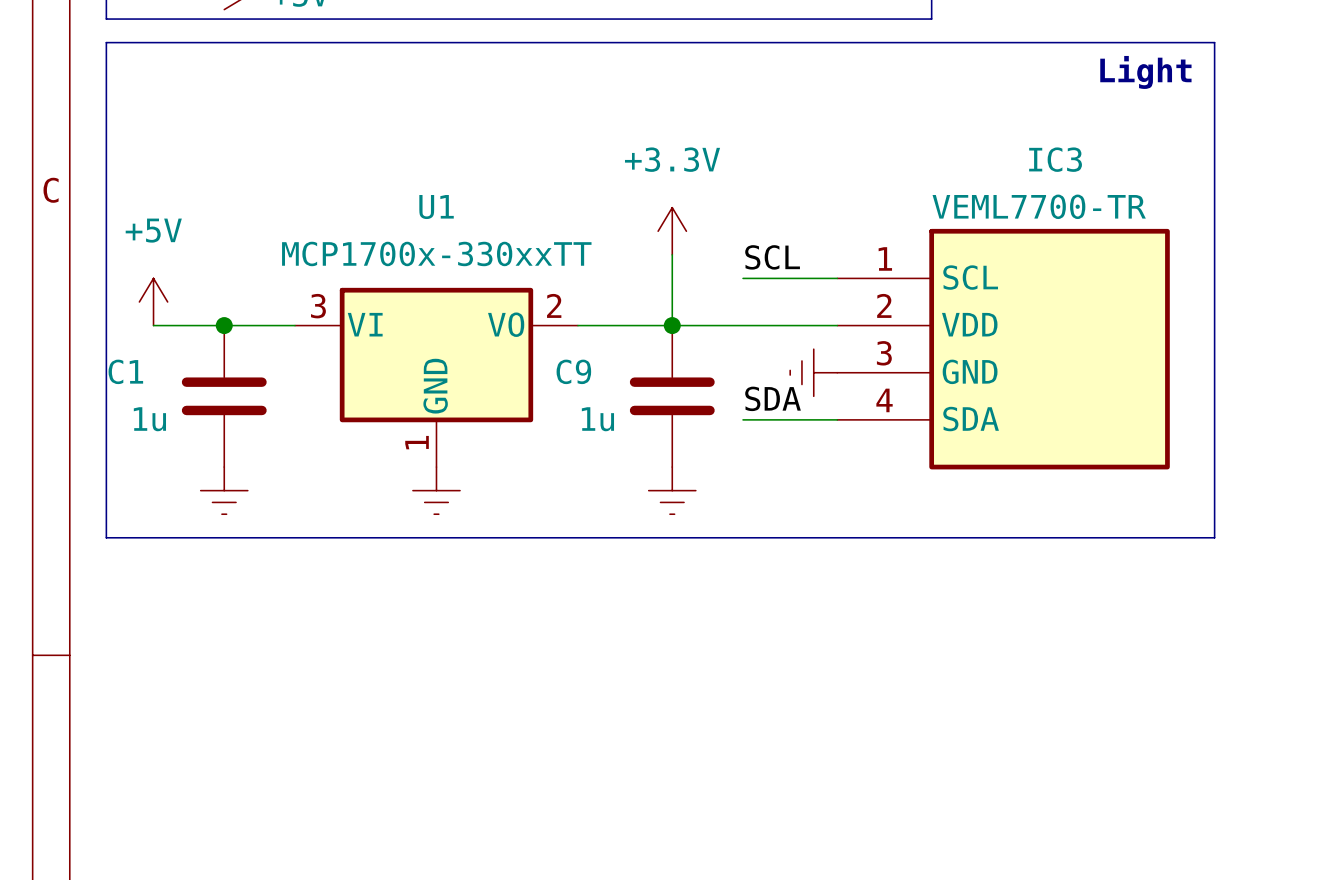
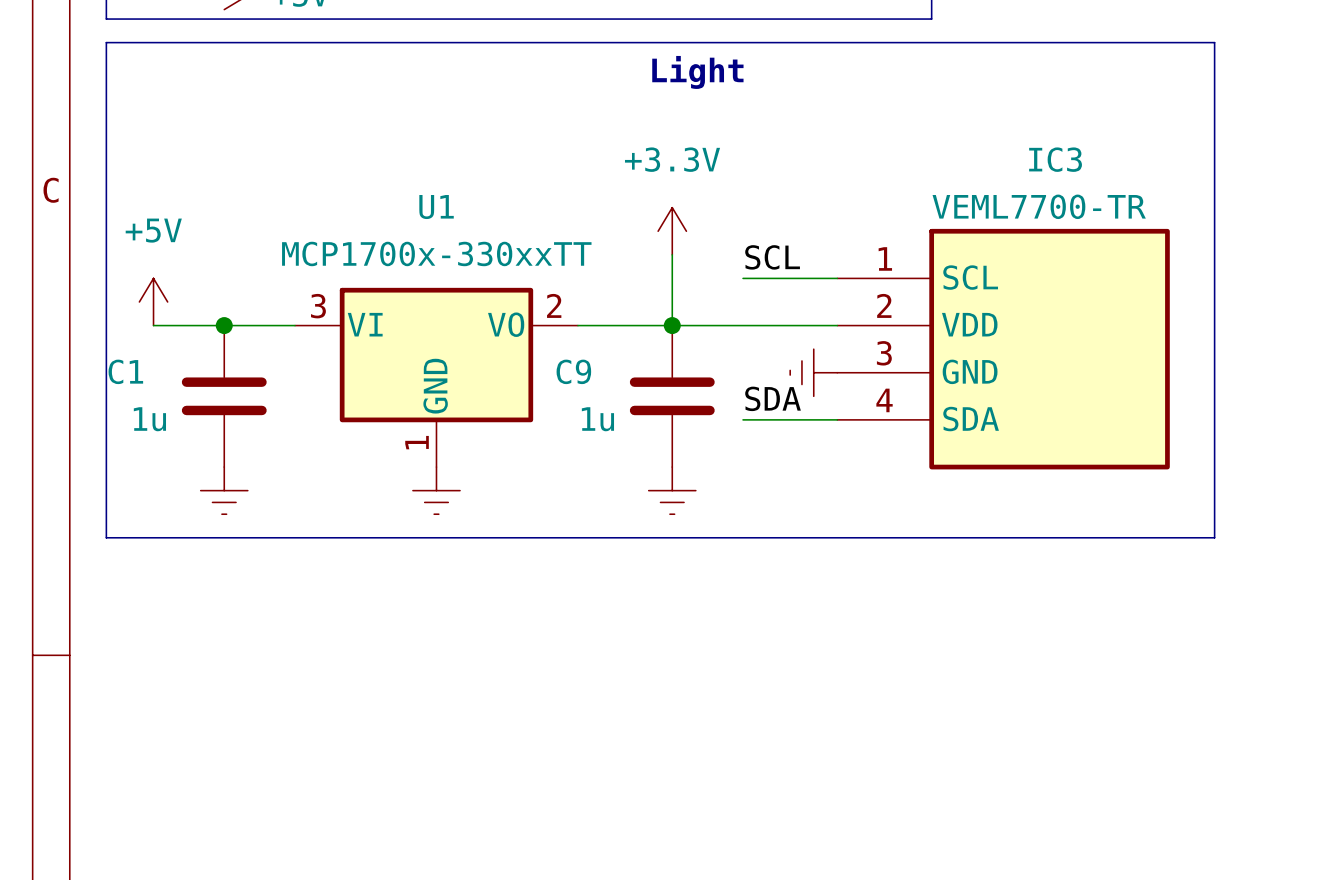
text position: Light (1145, 72) -> Light (697, 72)

